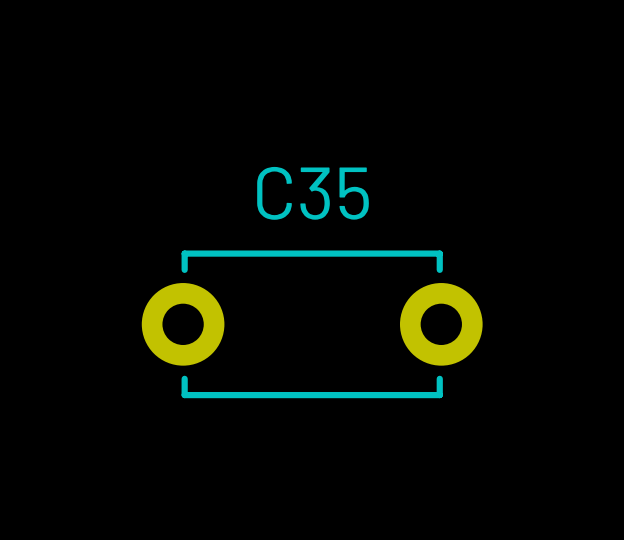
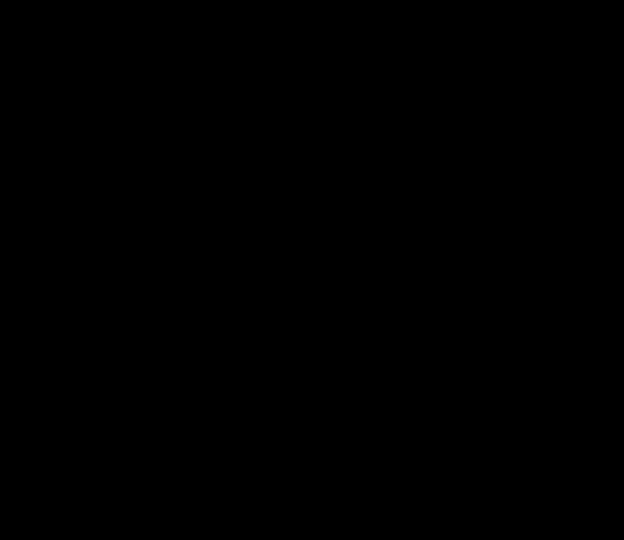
C35: (312, 324) -> none

